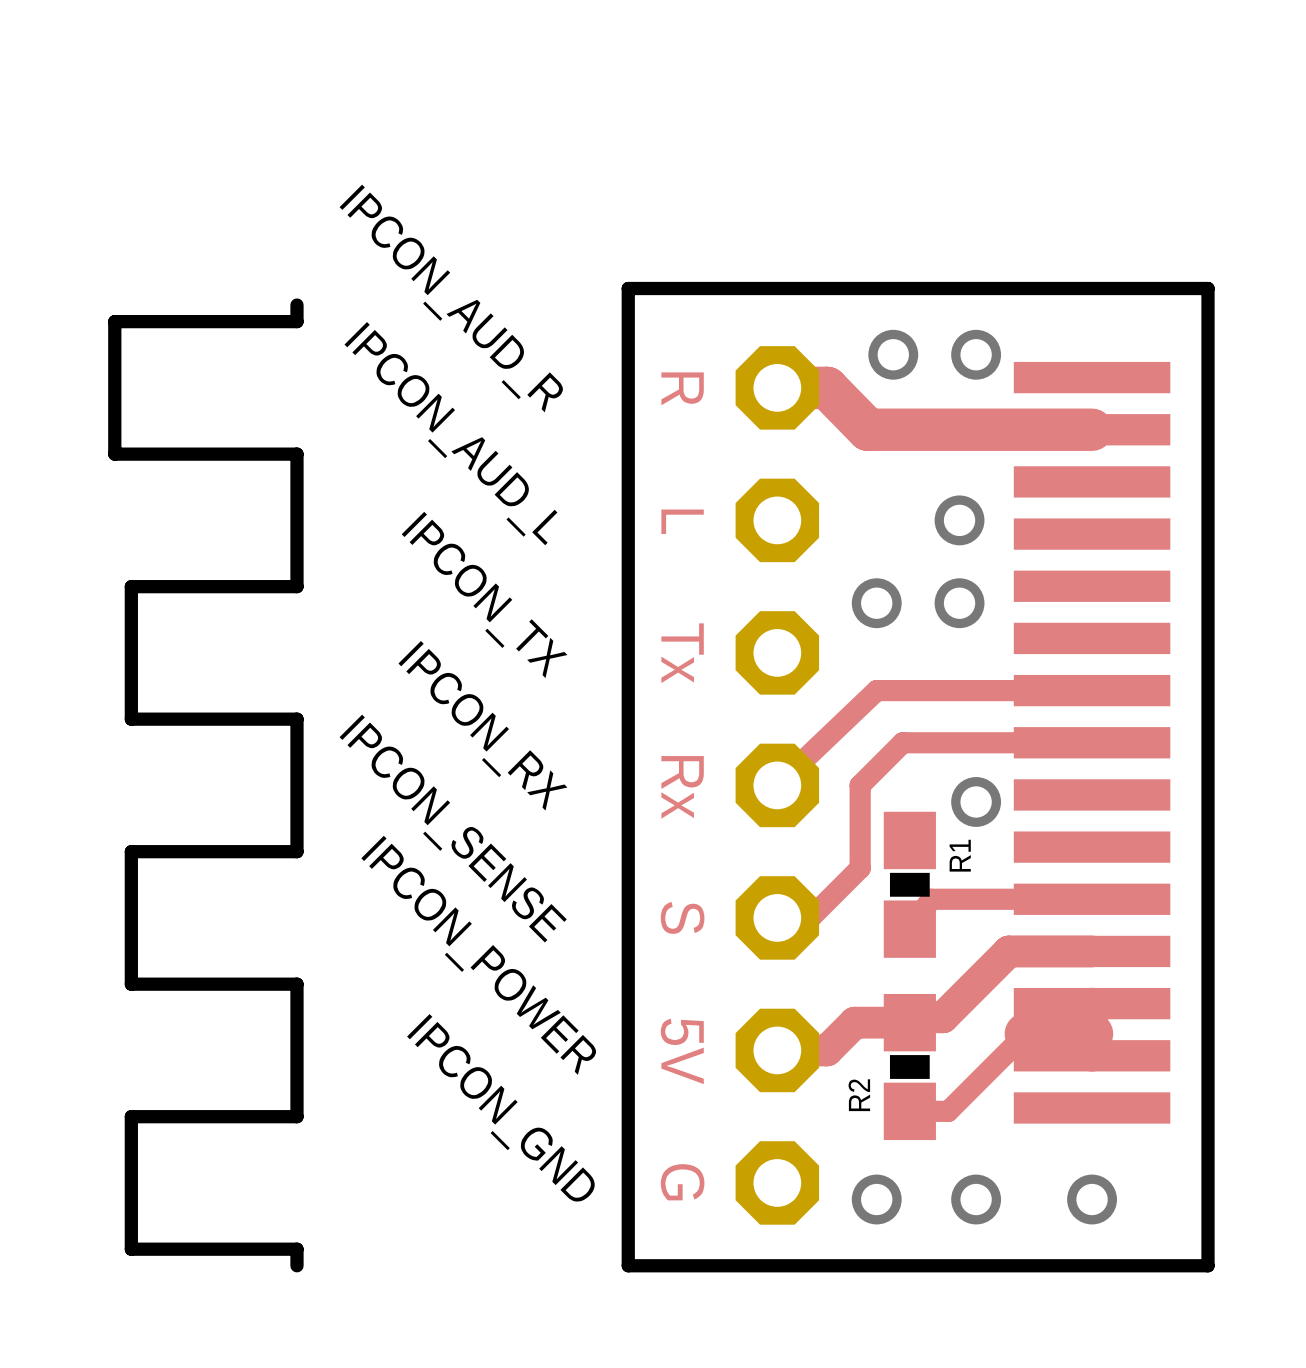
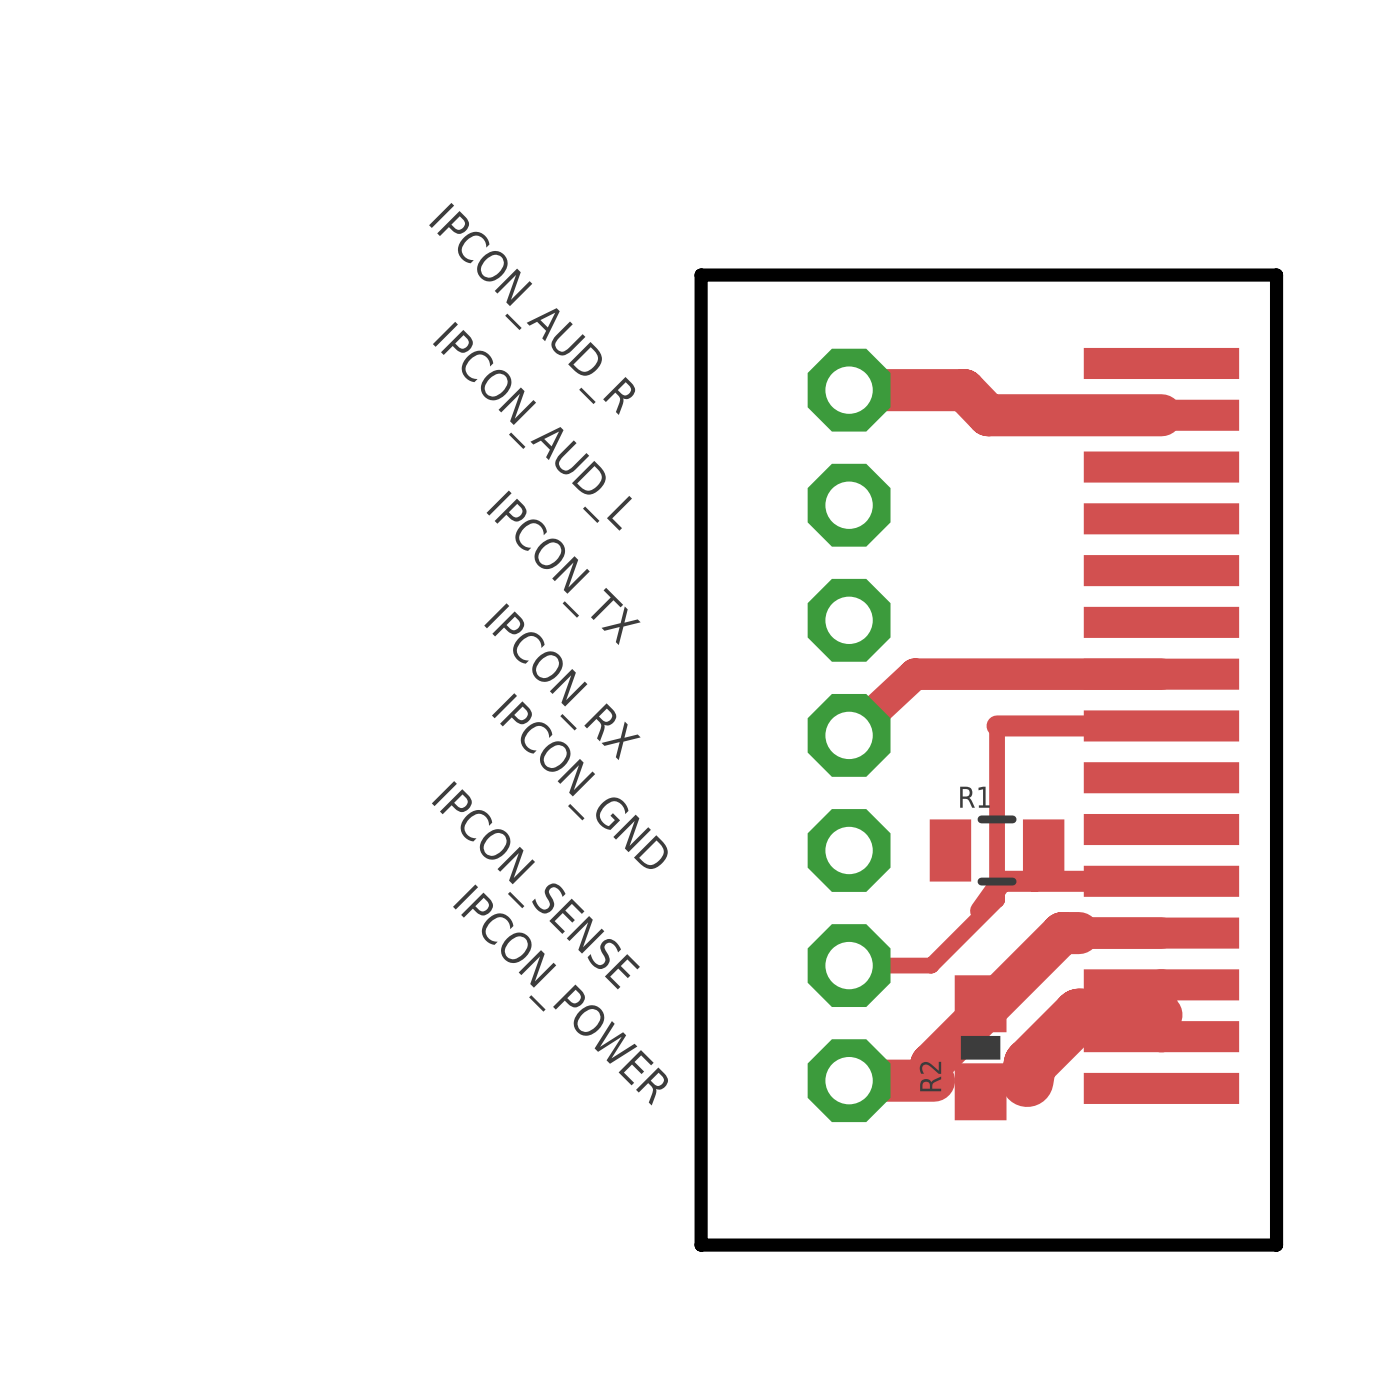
line: (296, 305) (296, 321) (114, 321) (114, 454) (296, 454) (296, 586) (131, 586) (131, 719) (296, 719) (296, 851) (131, 851) (131, 984) (296, 984) (296, 1116) (131, 1116) (131, 1249) (296, 1249) (296, 1265) -> none
via: (893, 354) -> none
via: (976, 354) -> none
track: (777, 387) (827, 387) (867, 429) (917, 429) -> (849, 390) (964, 390) (988, 415)
IPCON_AUD_R position: (777, 387) -> (849, 390)
text: R (682, 388) -> none
via: (959, 520) -> none
text: L (682, 521) -> none
via: (876, 603) -> none
via: (959, 603) -> none
IPCON_TX position: (777, 652) -> (849, 620)
text: Tx (682, 653) -> none
track: (876, 690) (777, 785) -> (947, 674) (914, 674) (849, 735)
track width: thin (876, 690) (1092, 690) -> thick (947, 674) (1161, 674)
track: (926, 742) (902, 742) (860, 785) (860, 868) (810, 917) (777, 917) -> (997, 725) (997, 899) (931, 965) (849, 965)
IPCON_RX position: (777, 785) -> (849, 735)
text: Rx (682, 787) -> none
via: (976, 801) -> none
R1 footprint: [883, 811, 936, 958] -> [929, 815, 1065, 886]
text: S (682, 917) -> none
IPCON_SENSE position: (777, 917) -> (849, 965)
track: (1008, 951) (942, 1017) (915, 1017) (909, 1022) (854, 1022) (827, 1050) (777, 1050) -> (1078, 933) (1062, 933) (931, 1064) (931, 1073) (934, 1080) (849, 1080)
track: (1025, 1033) (948, 1111) (909, 1111) -> (1095, 1014) (1079, 1014) (1029, 1064) (1027, 1080)
IPCON_POWER position: (777, 1050) -> (849, 1080)
text: 5V (682, 1051) -> none
text: G (682, 1182) -> none
IPCON_GND position: (777, 1182) -> (849, 850)
via: (876, 1199) -> none
via: (976, 1199) -> none
via: (1092, 1199) -> none

